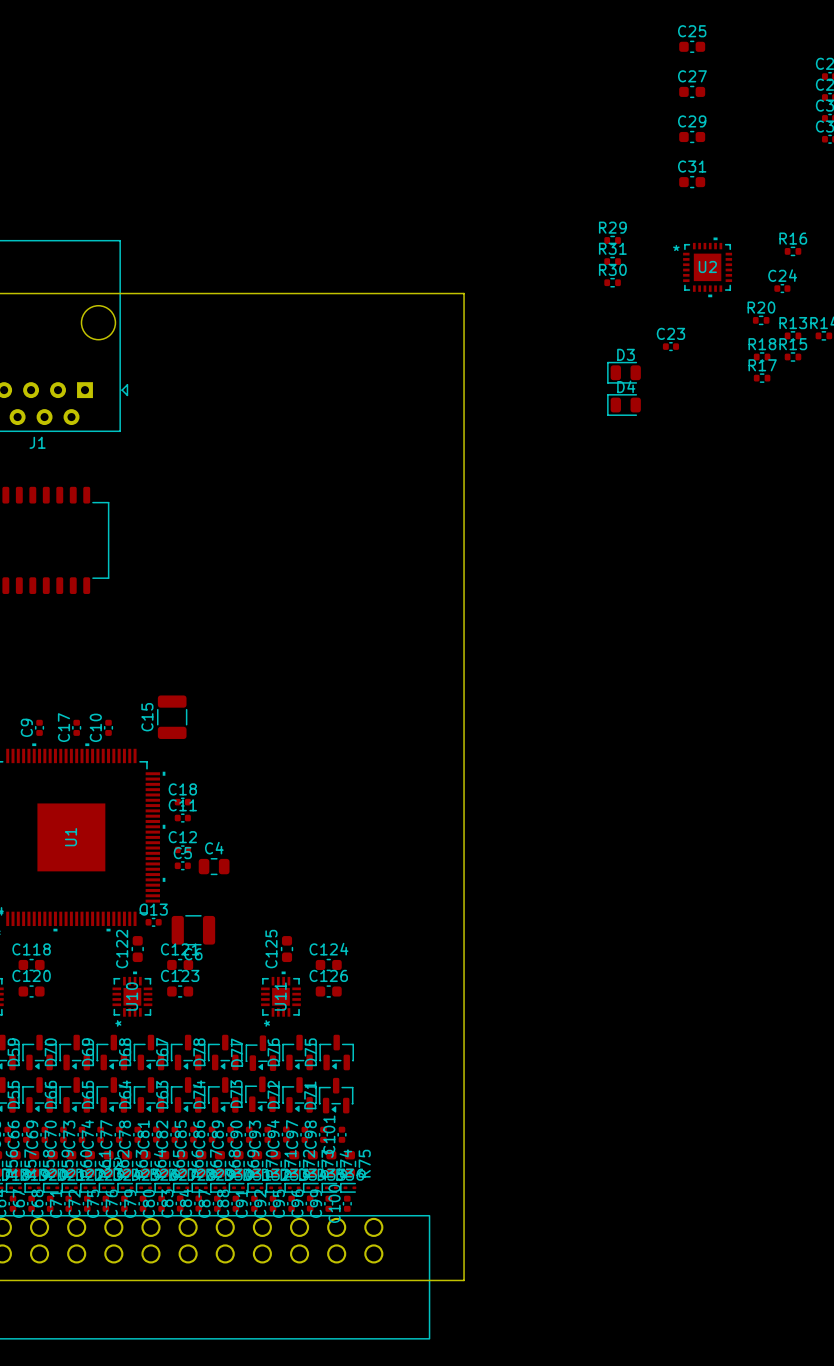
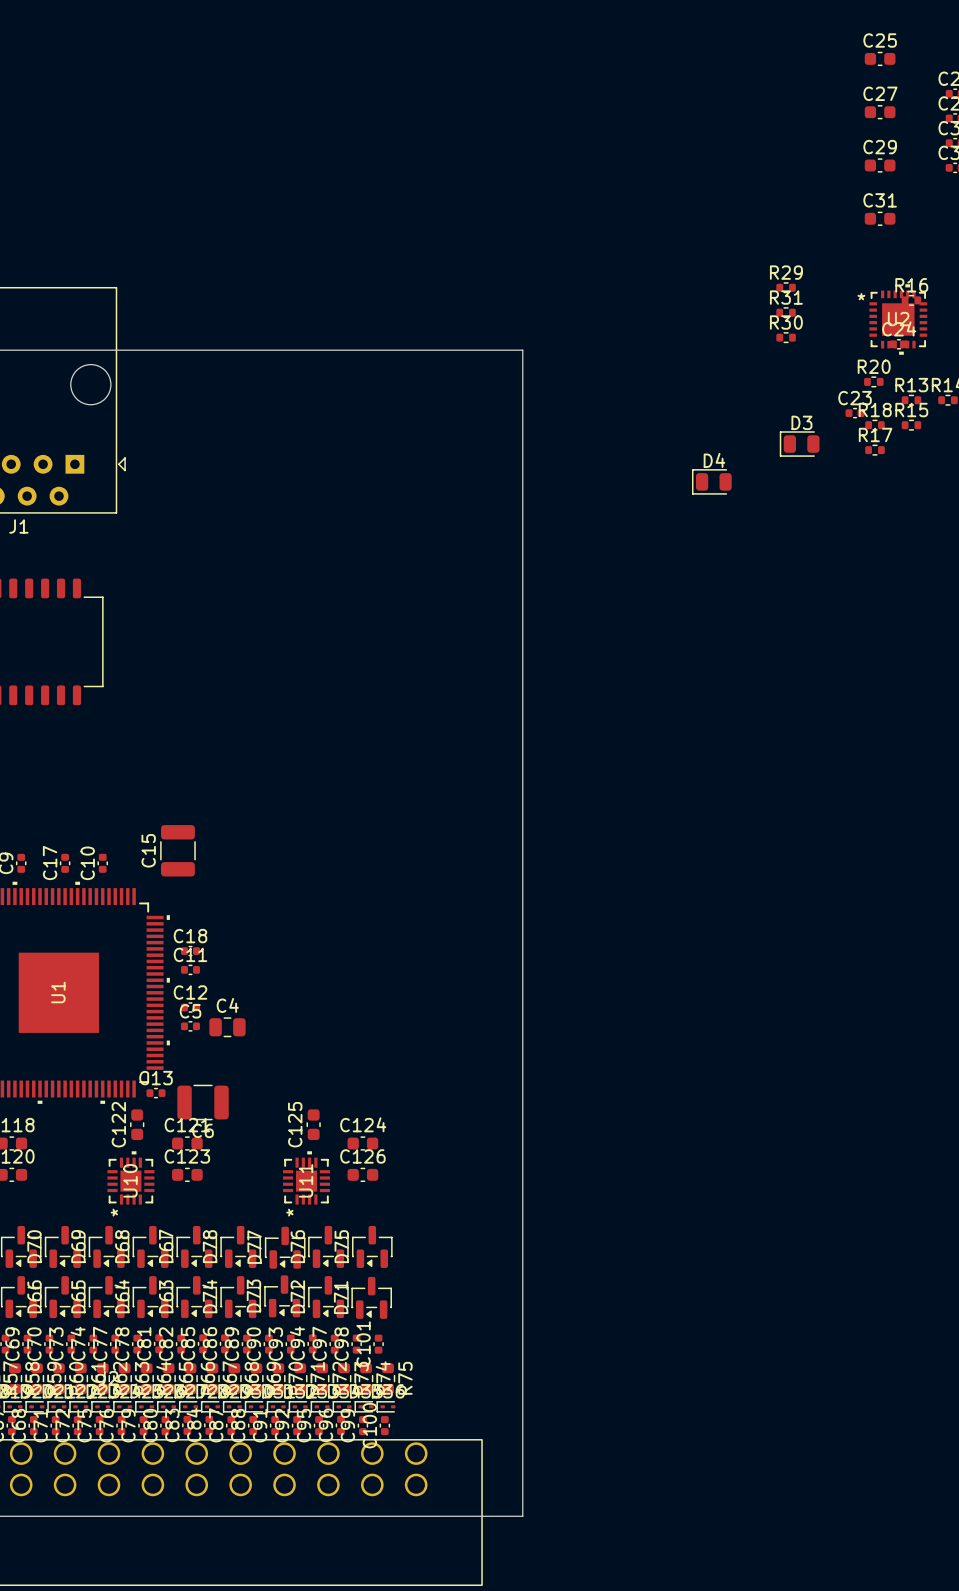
C25 position: (692, 46) -> (880, 58)
C27 position: (692, 91) -> (880, 112)
C29 position: (692, 137) -> (880, 165)
C31 position: (692, 182) -> (880, 218)
R29 position: (612, 240) -> (786, 287)
R31 position: (612, 261) -> (786, 312)
U2 position: (707, 267) -> (898, 319)
R30 position: (612, 282) -> (786, 337)
C23 position: (670, 346) -> (855, 413)
D3 position: (624, 372) -> (799, 444)

